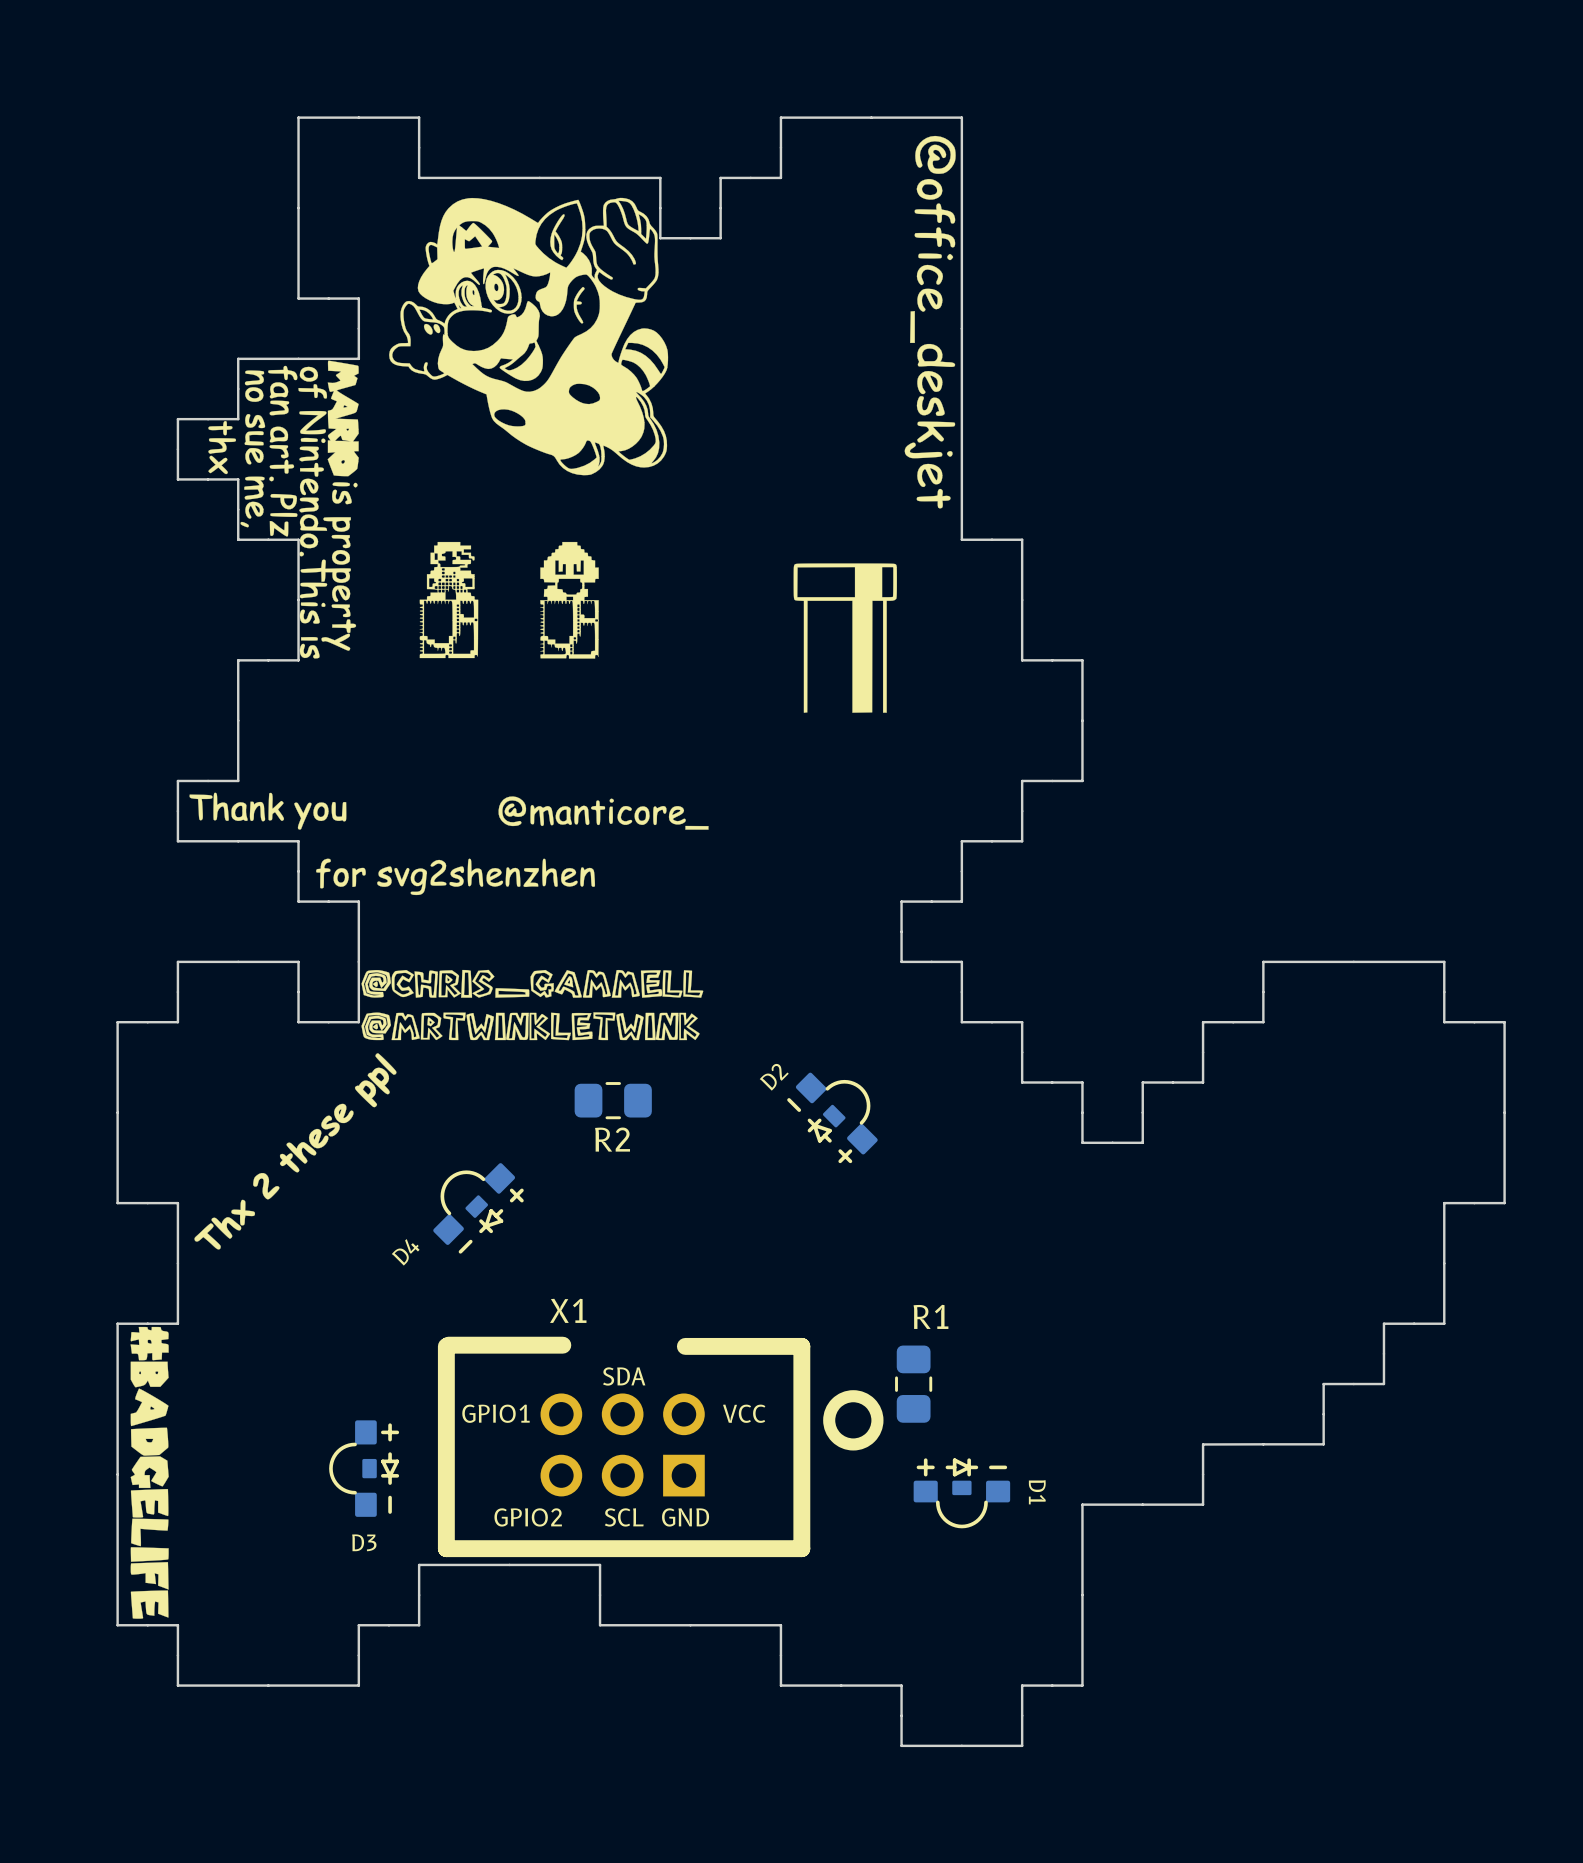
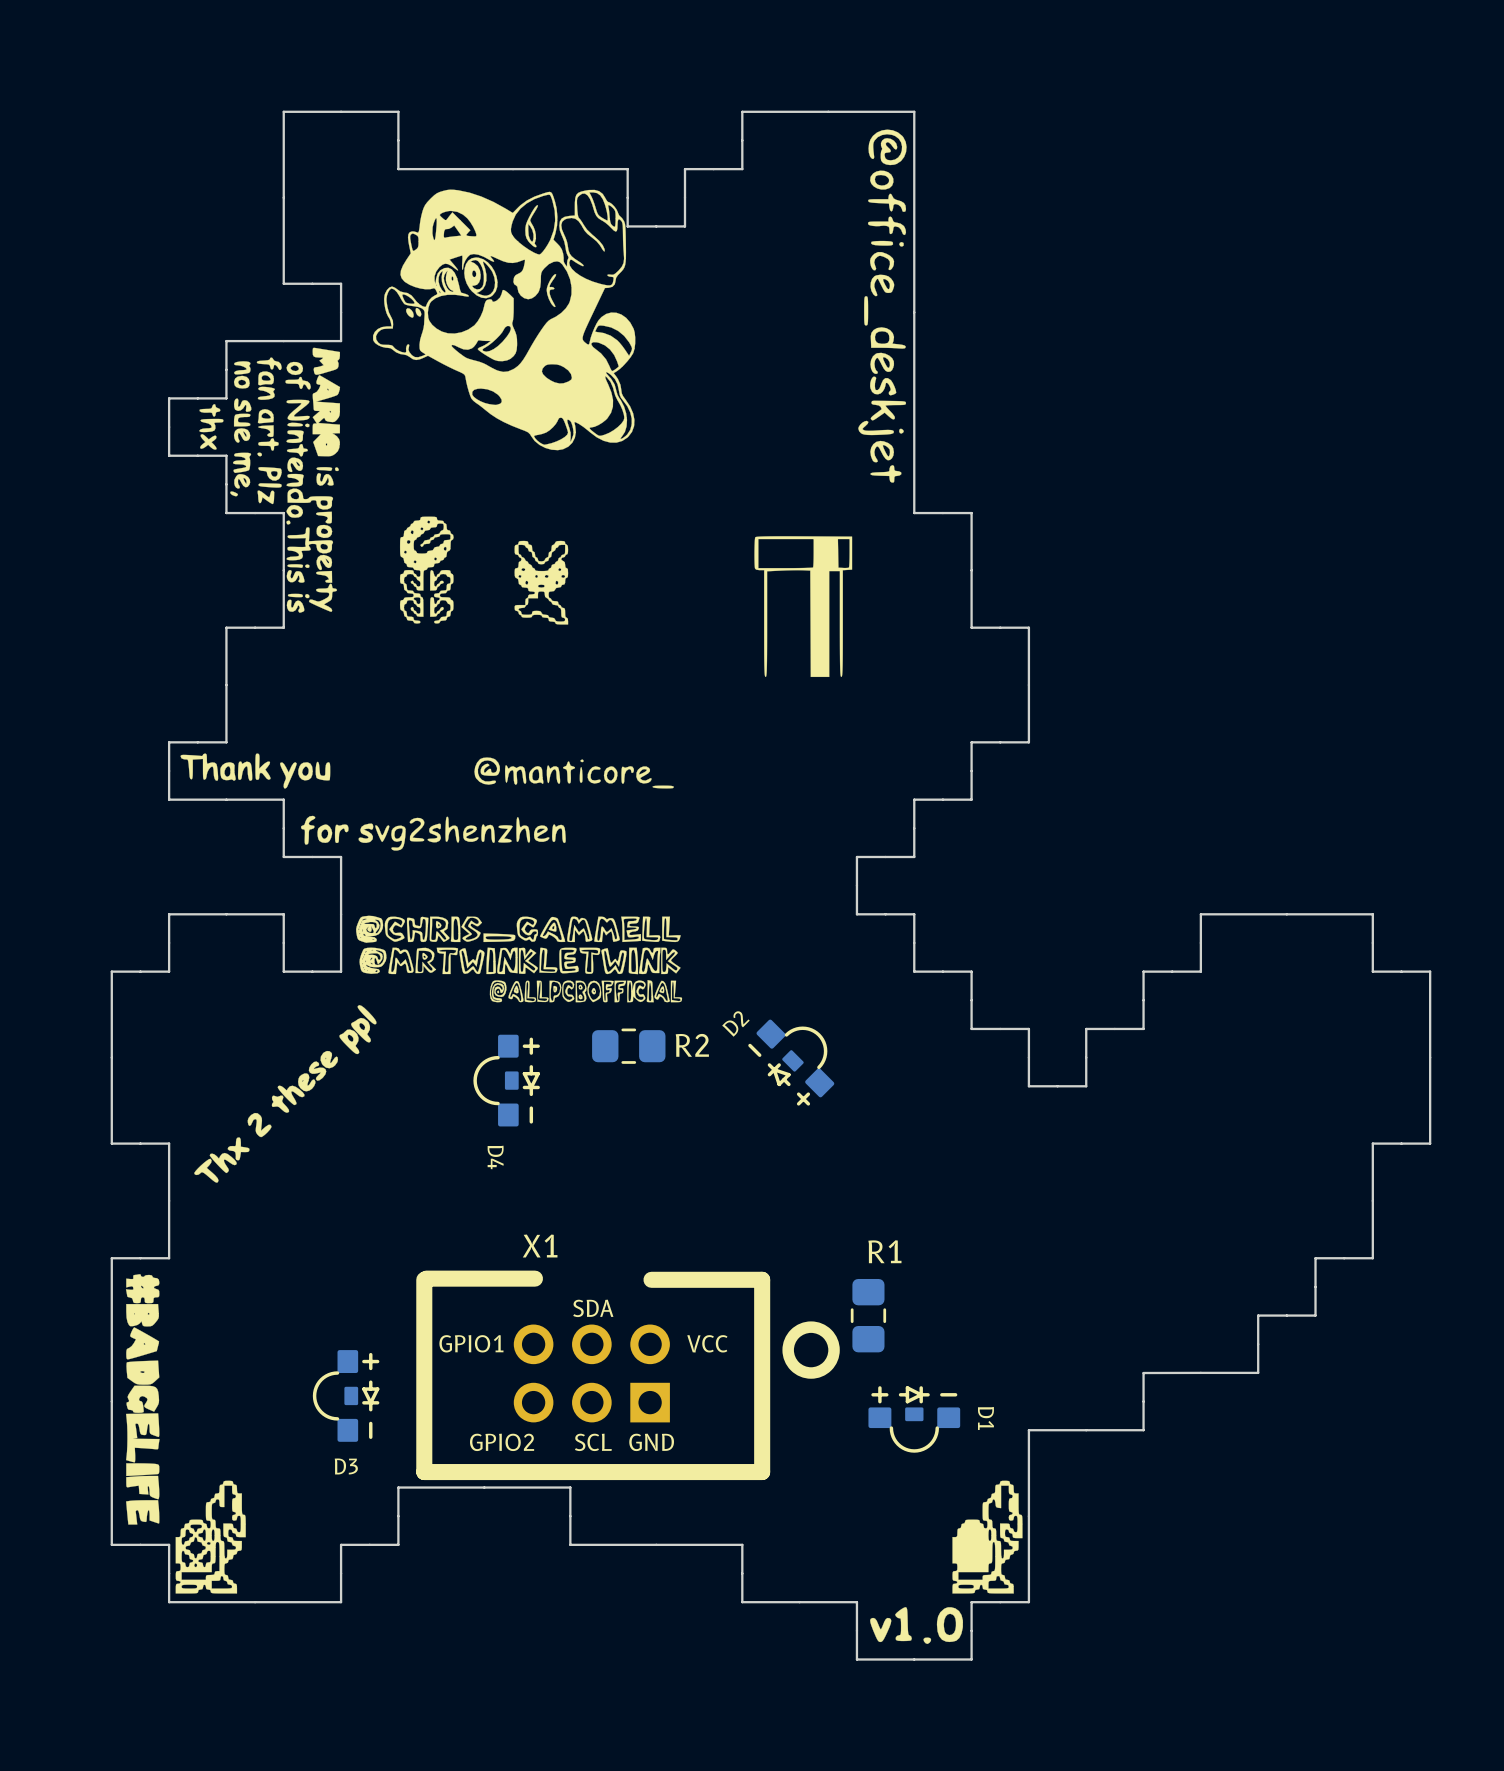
drawing: [130, 135, 956, 1619] -> none
drawing: none -> [125, 129, 1023, 1645]
R2 position: (613, 1100) -> (628, 1046)
R2 name position: R2 (612, 1139) -> R2 (692, 1045)
D4 rotation: 0° (478, 1208) -> 45° counterclockwise (506, 1080)
D4 position: (478, 1208) -> (506, 1080)

